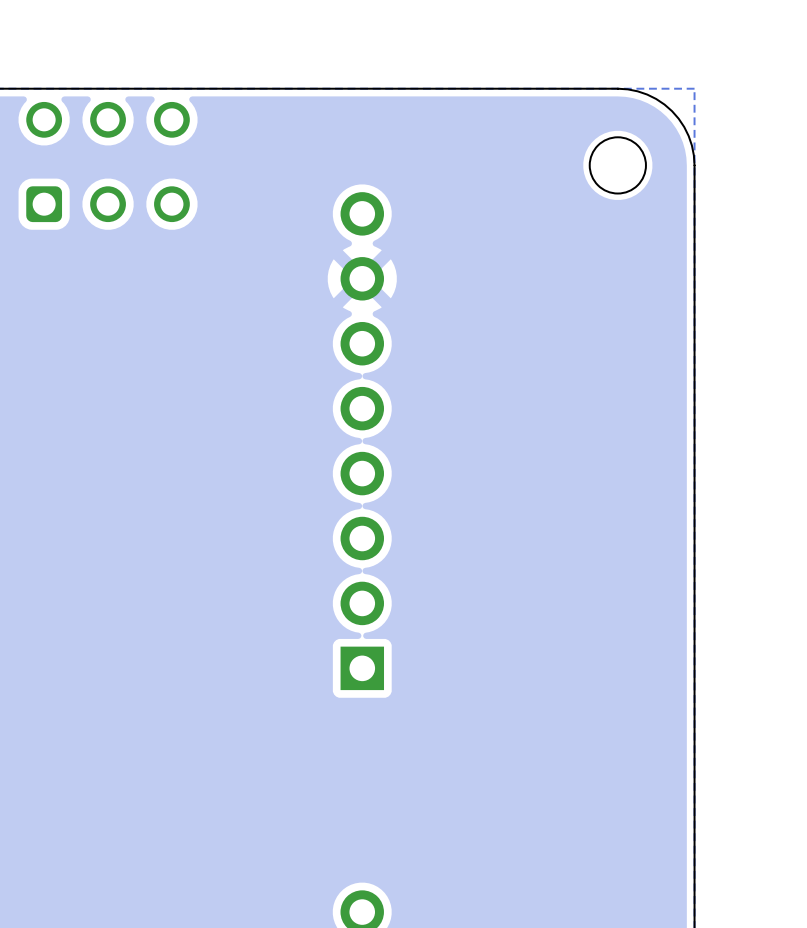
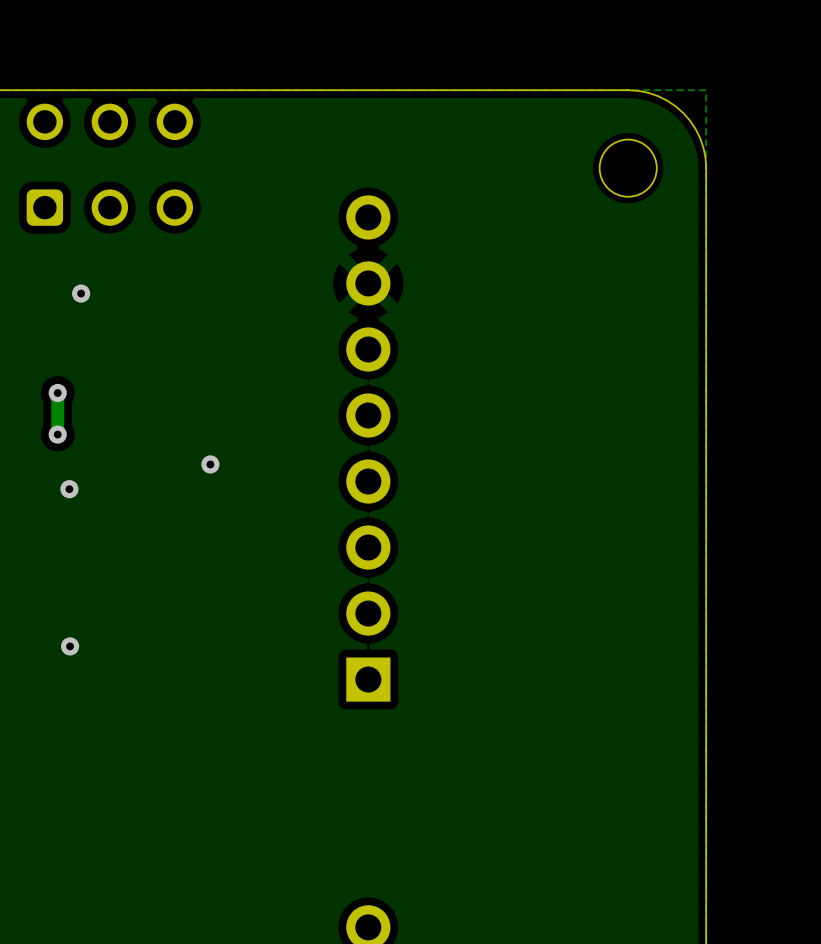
via: none -> (81, 293)
track: none -> (57, 392) (57, 434)
via: none -> (57, 392)
via: none -> (57, 434)
via: none -> (210, 464)
via: none -> (69, 489)
via: none -> (70, 646)

